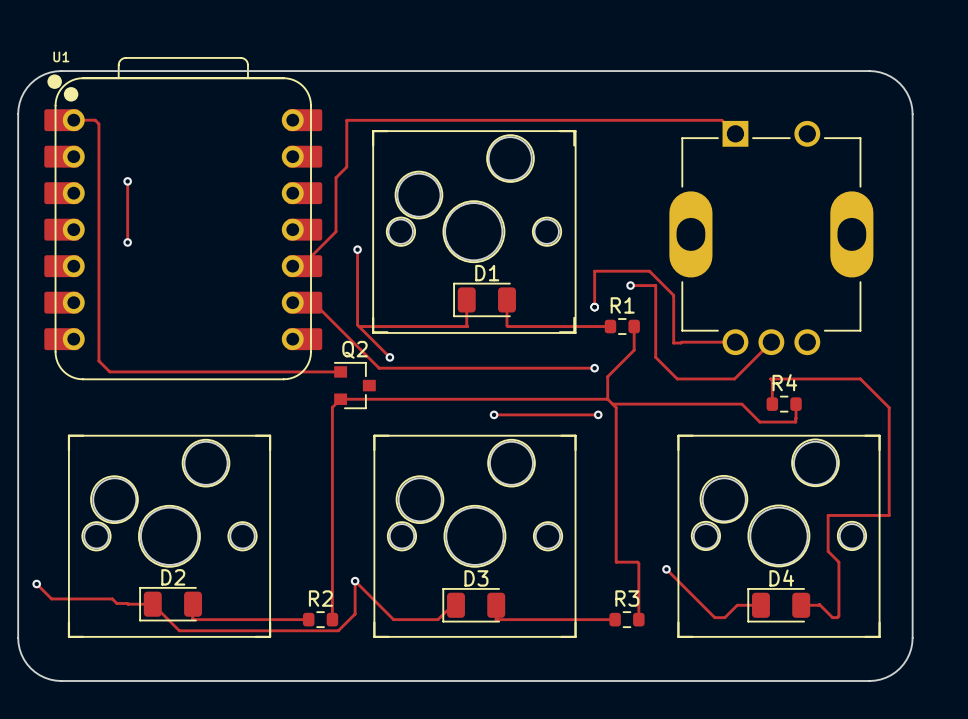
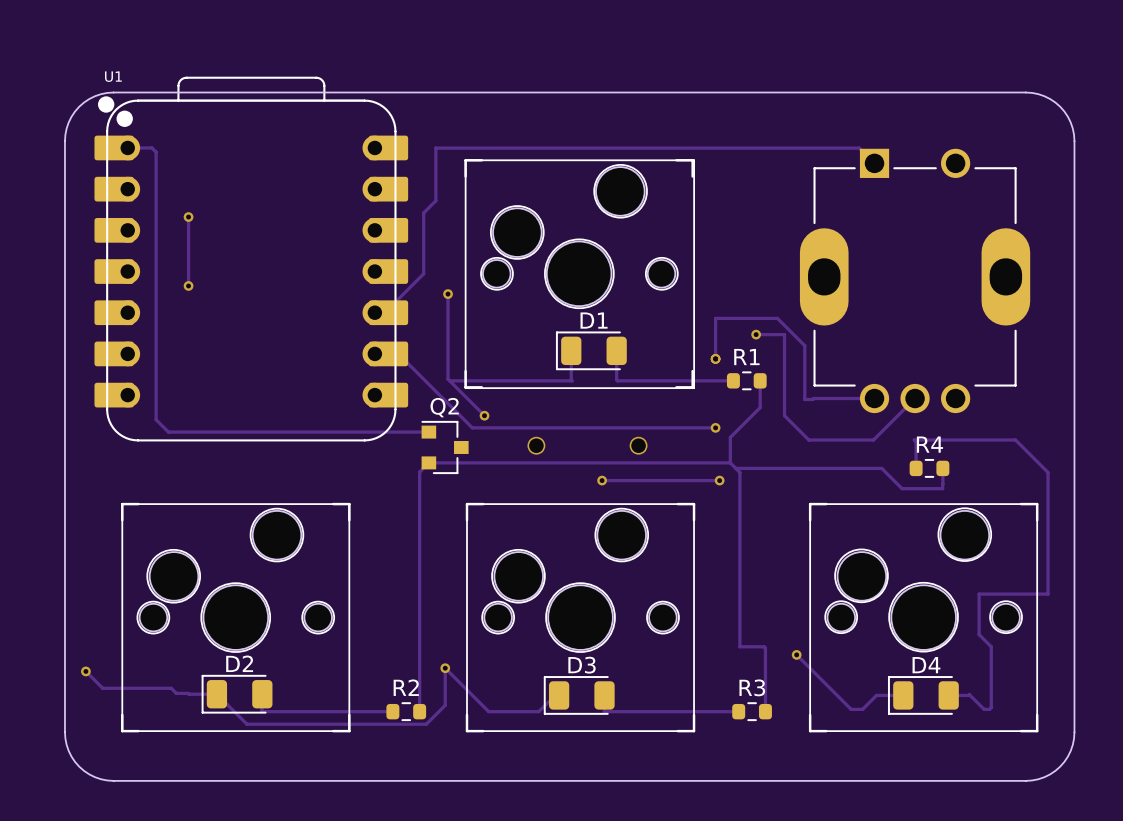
via: none -> (536, 445)
via: none -> (638, 445)

